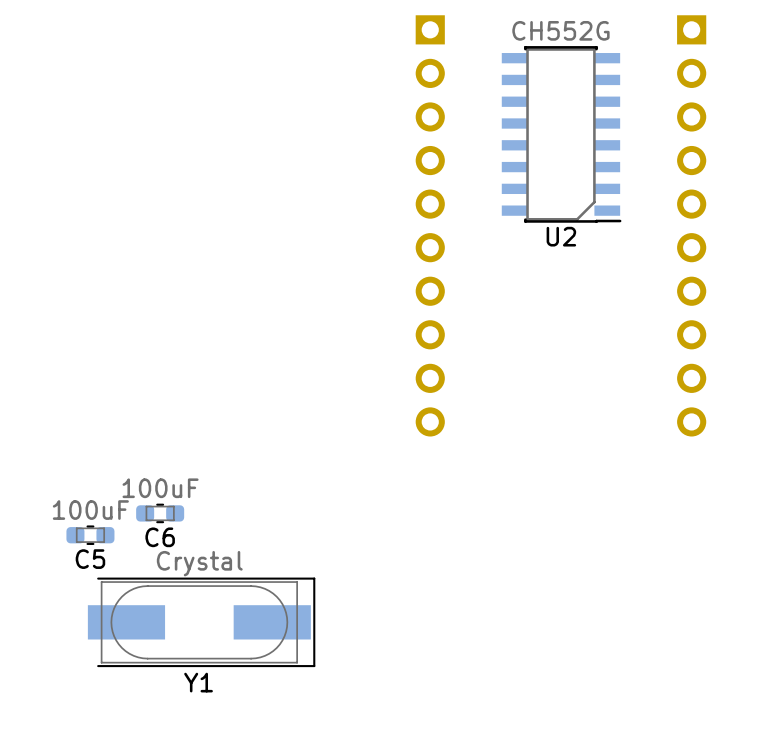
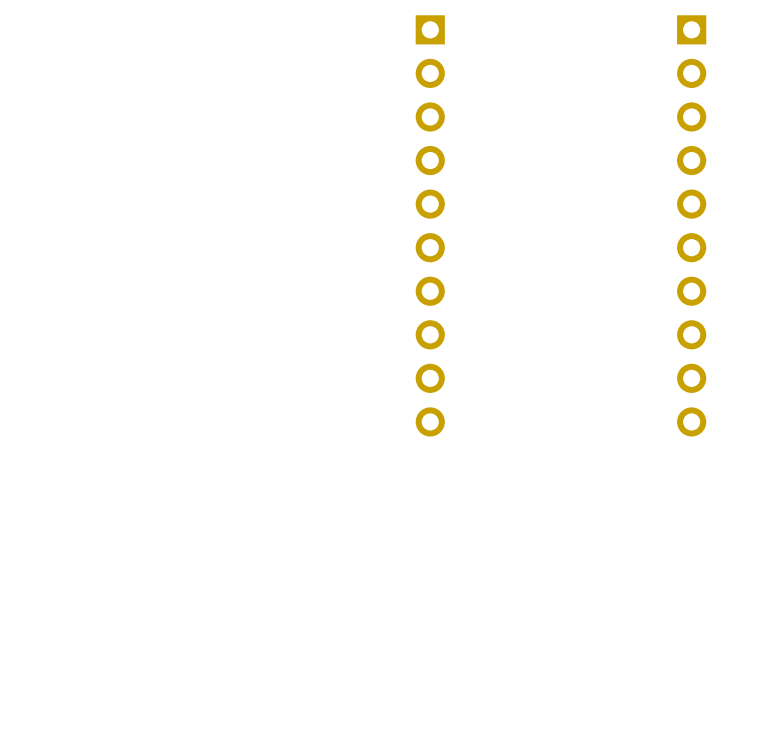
U2: CH552G (561, 134) -> none
C6: 100uF (160, 513) -> none
C5: 100uF (90, 535) -> none
Y1: Crystal (201, 622) -> none

